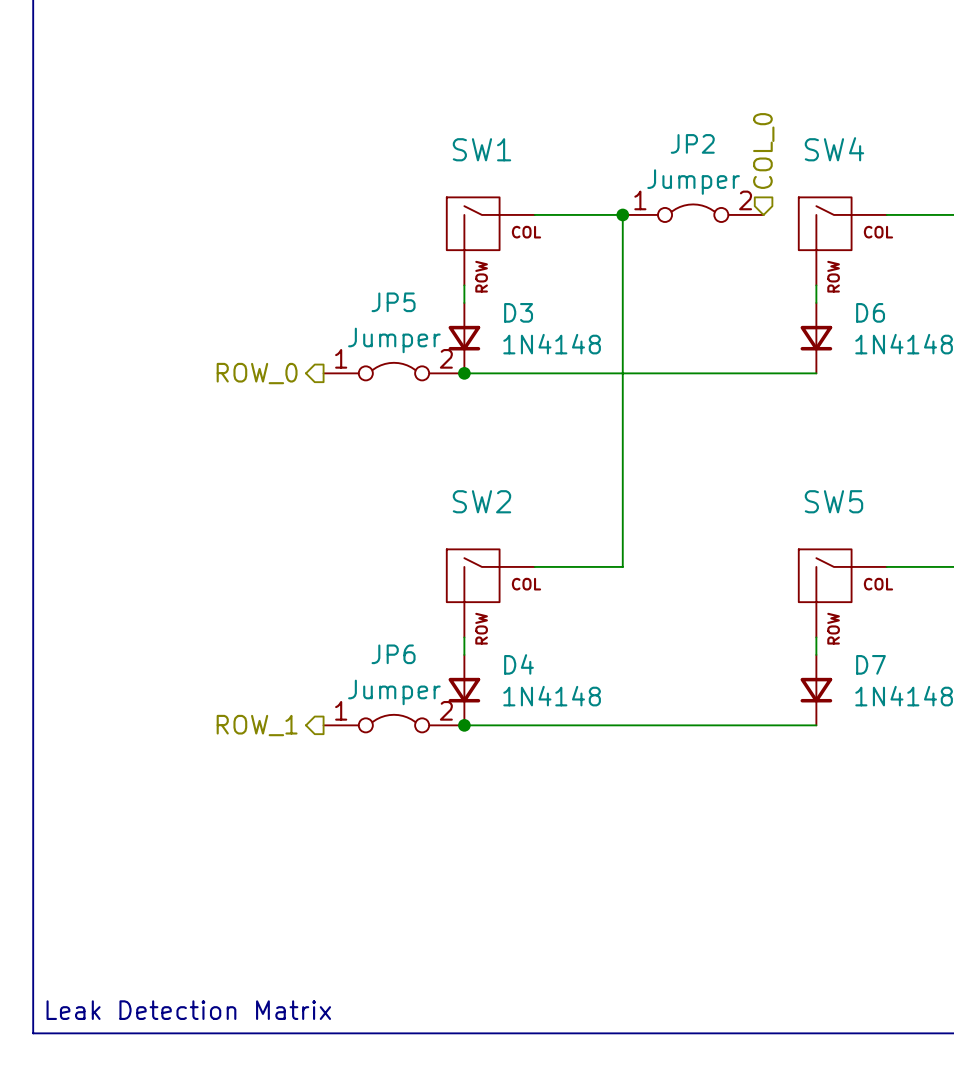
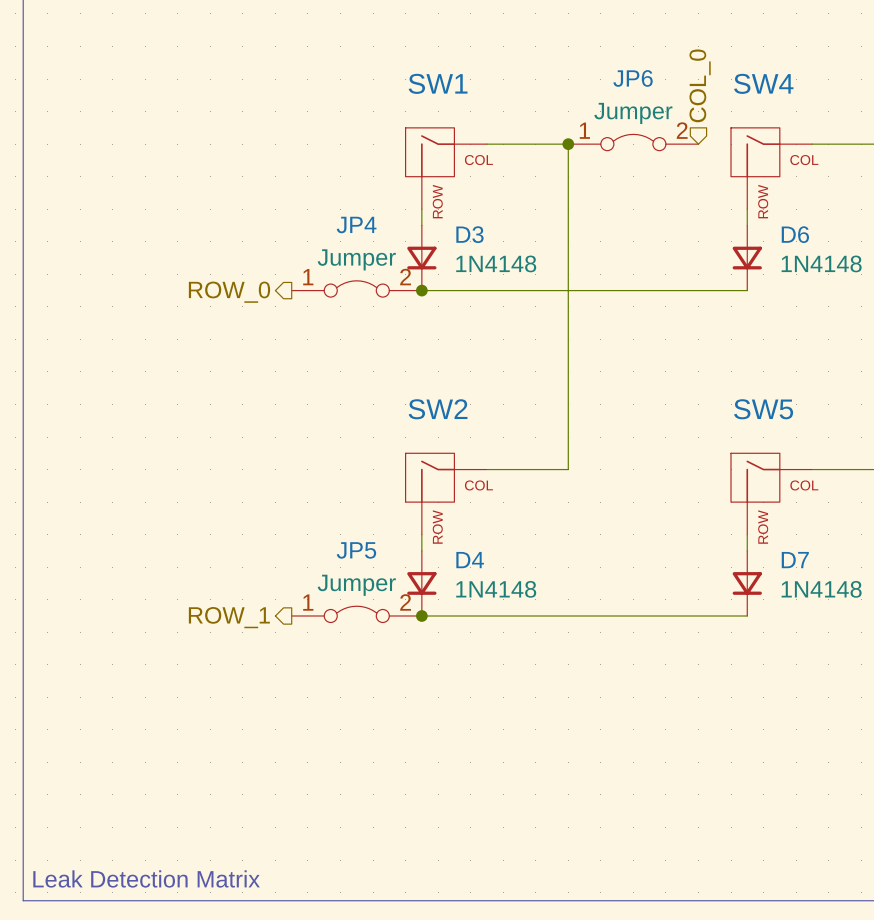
JP2 name: JP2 (692, 143) -> JP6 (633, 78)
JP5 name: JP5 (393, 302) -> JP4 (356, 225)
JP6 name: JP6 (393, 654) -> JP5 (356, 550)

